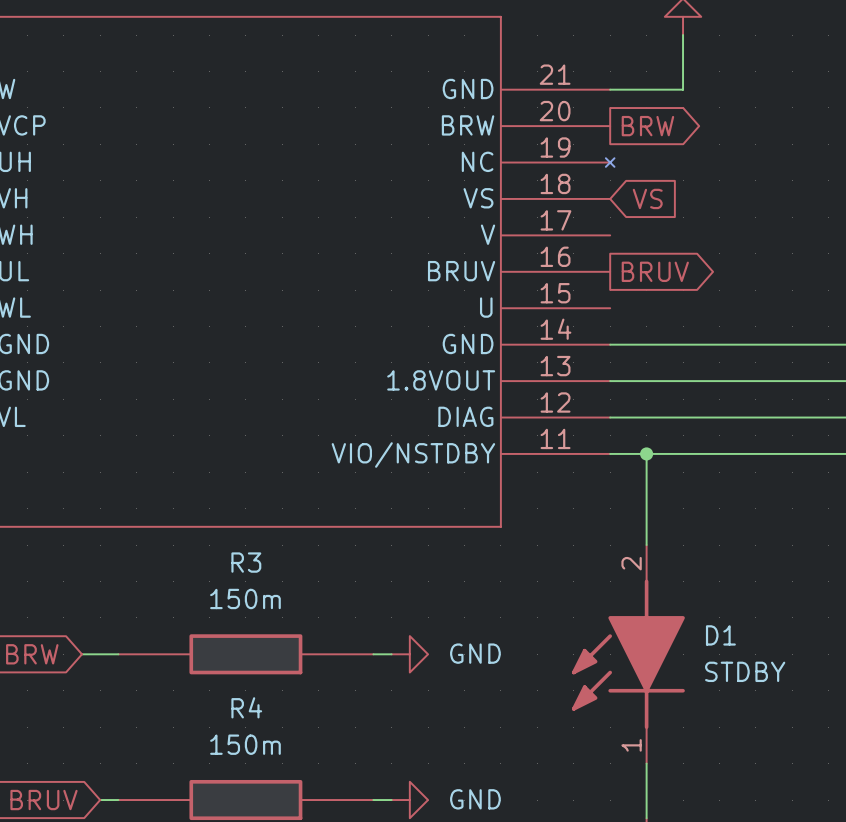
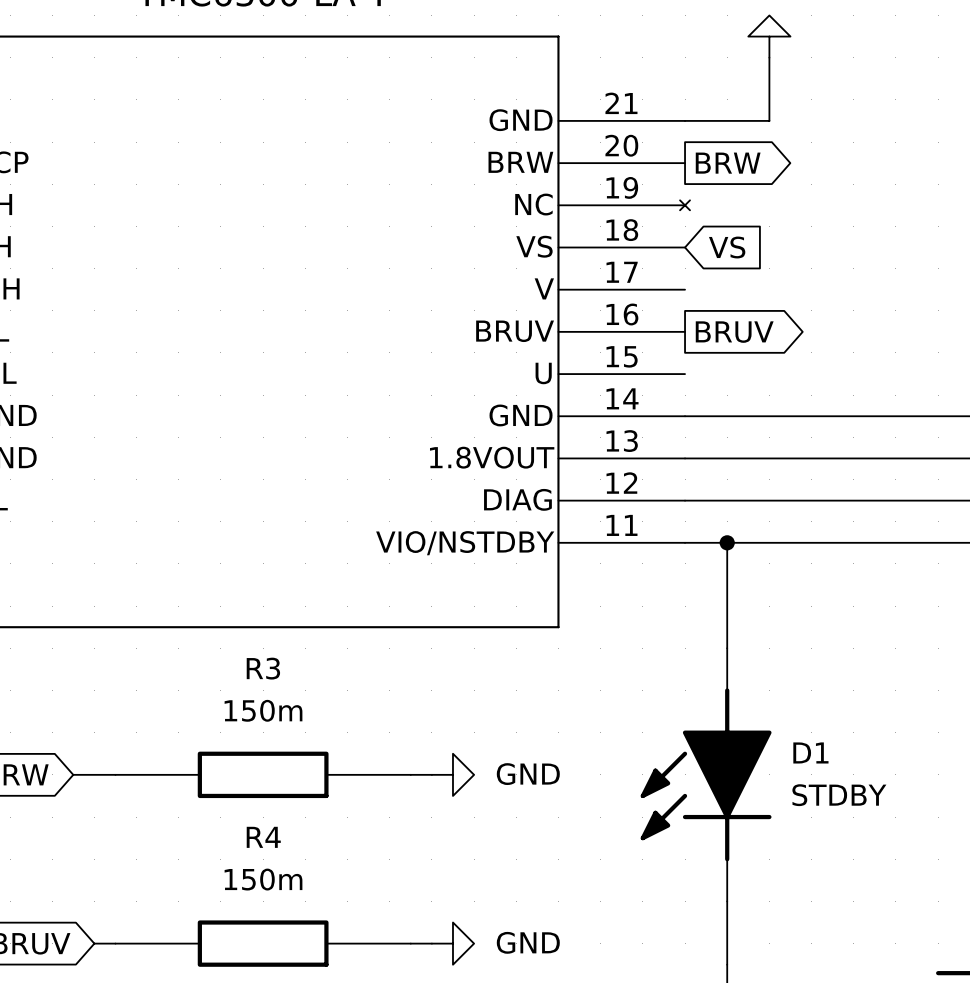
D1 pin number: 2 (631, 563) -> none
D1 pin number: 1 (631, 745) -> none

